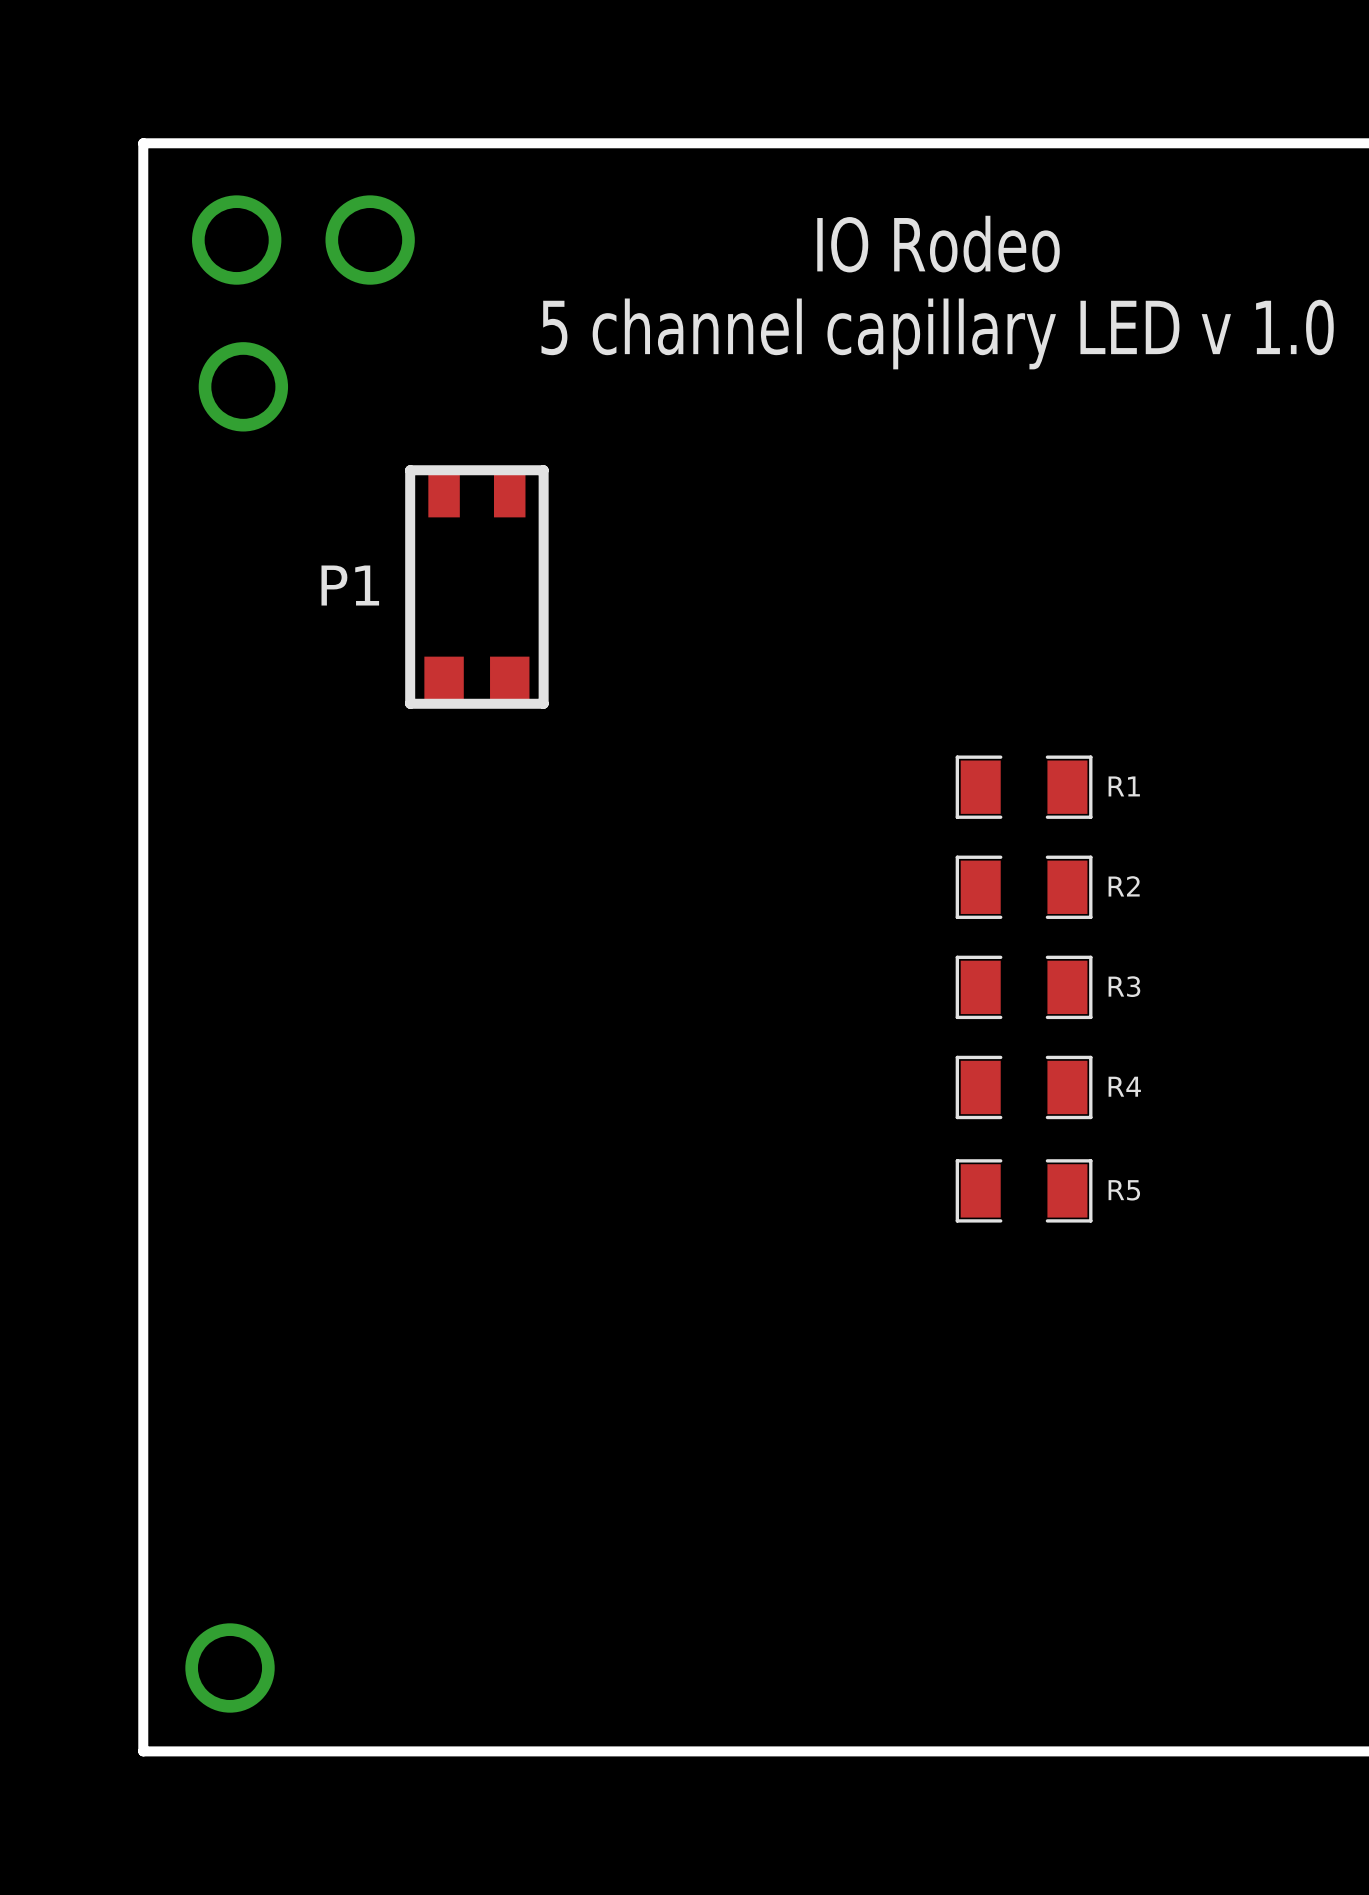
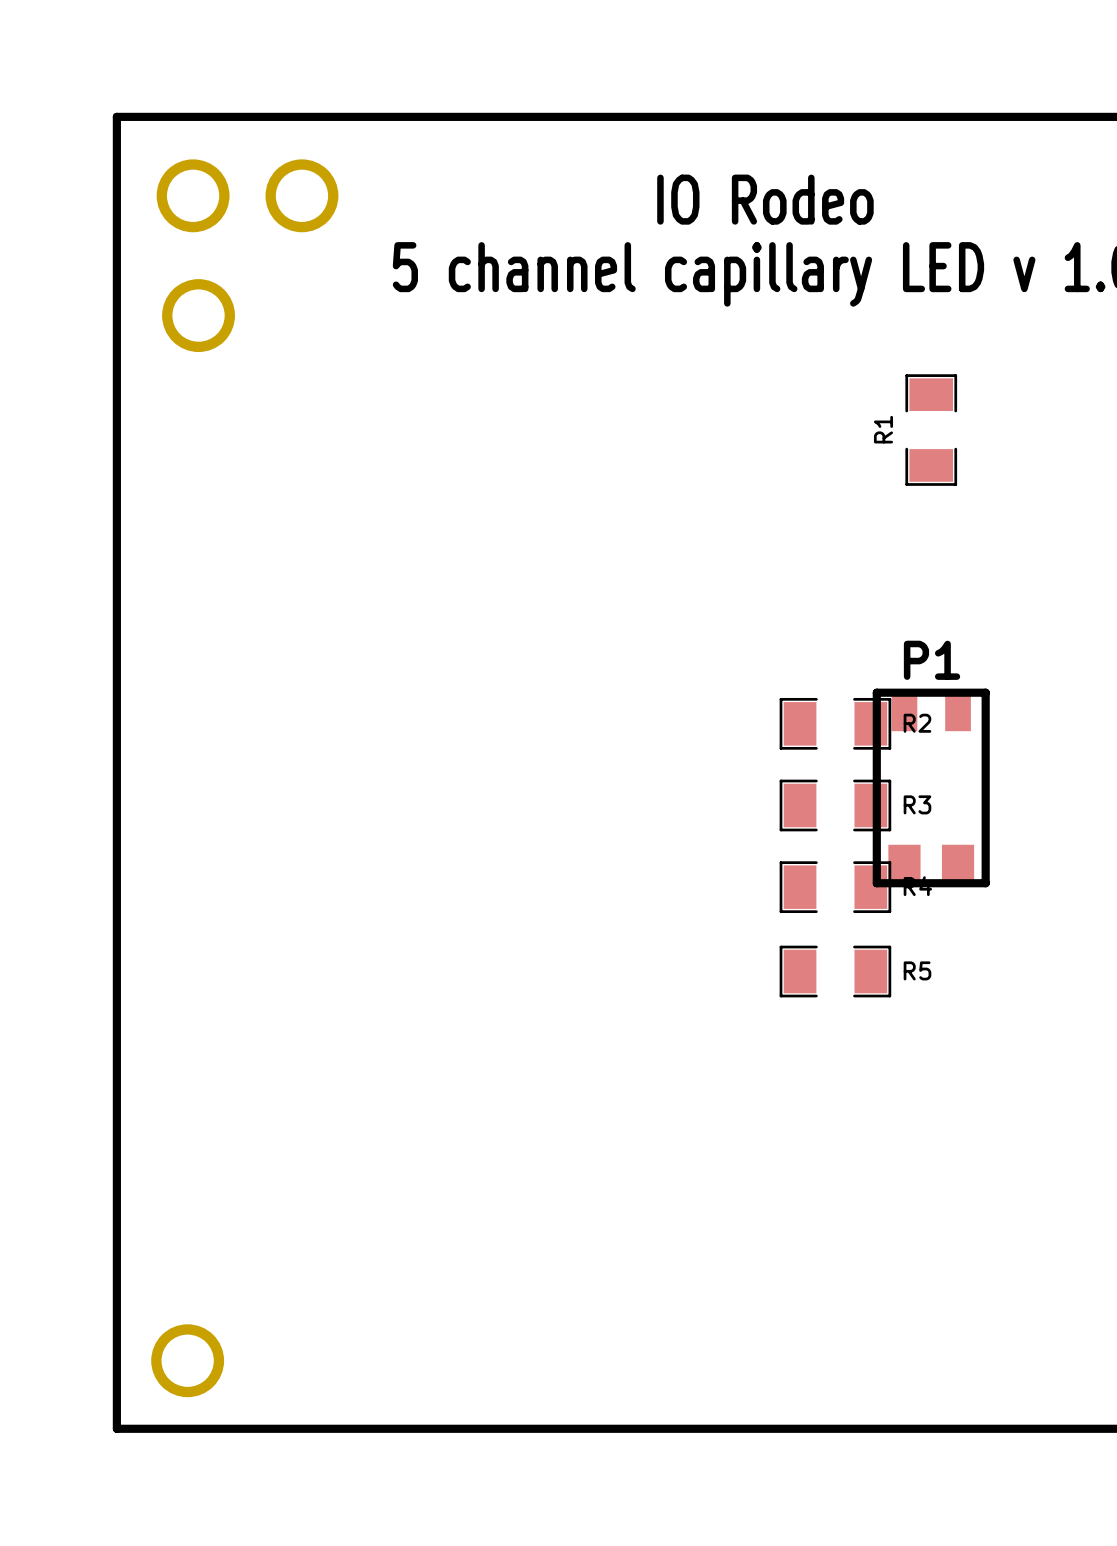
P1 name position: P1 (350, 585) -> P1 (932, 660)
P1 position: (476, 587) -> (931, 787)
R1 name position: R1 (1124, 786) -> R1 (883, 429)
R1 rotation: 0° (1024, 787) -> 90° clockwise (931, 430)
R1 position: (1024, 787) -> (931, 430)

